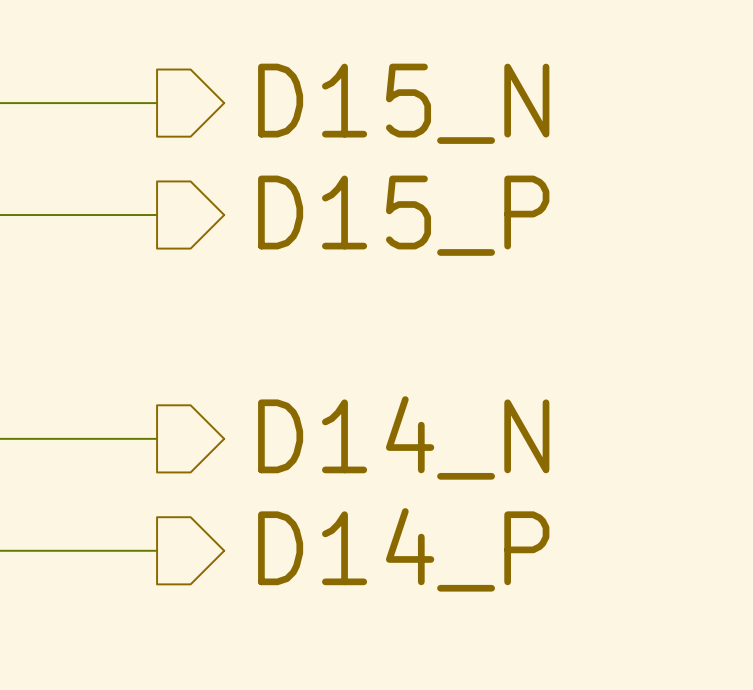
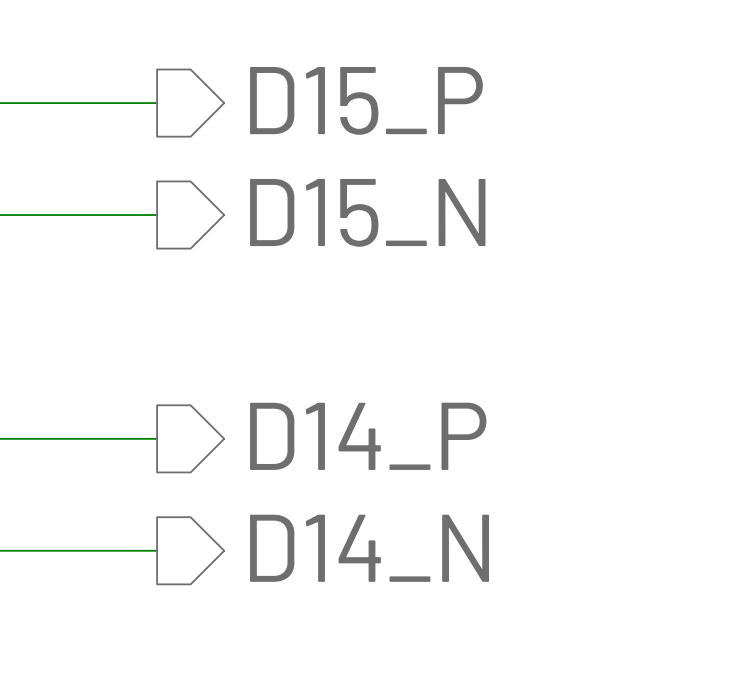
hierarchical label: D15_N (403, 103) -> D15_P (366, 100)
hierarchical label: D15_P (403, 215) -> D15_N (367, 212)
hierarchical label: D14_N (403, 437) -> D14_P (368, 436)
hierarchical label: D14_P (403, 549) -> D14_N (369, 548)

